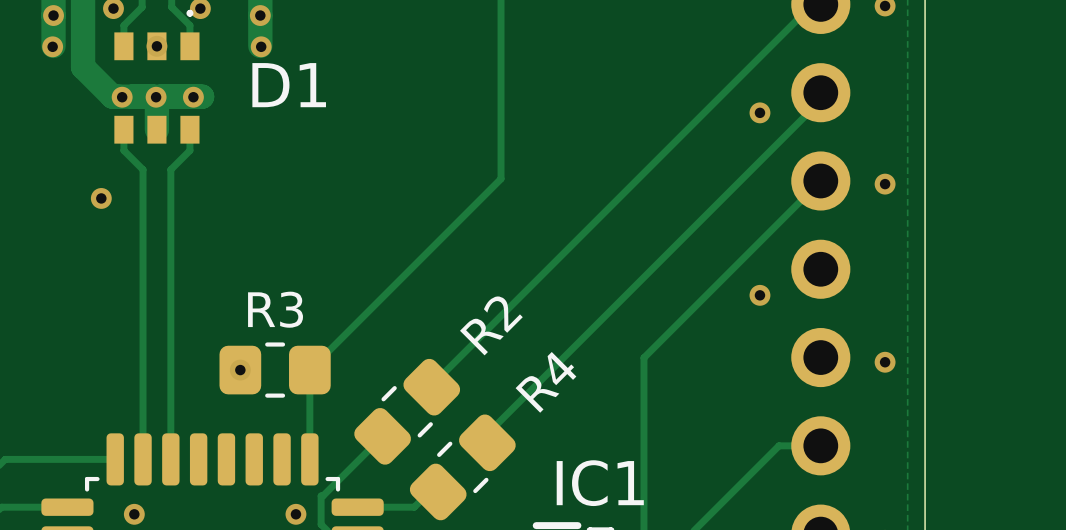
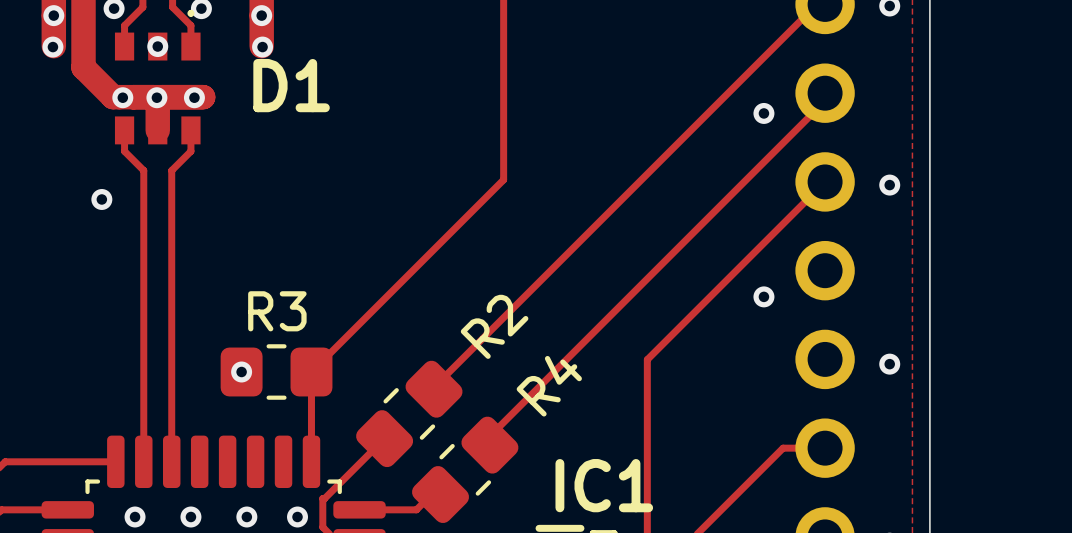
via: none -> (190, 516)
via: none -> (246, 516)

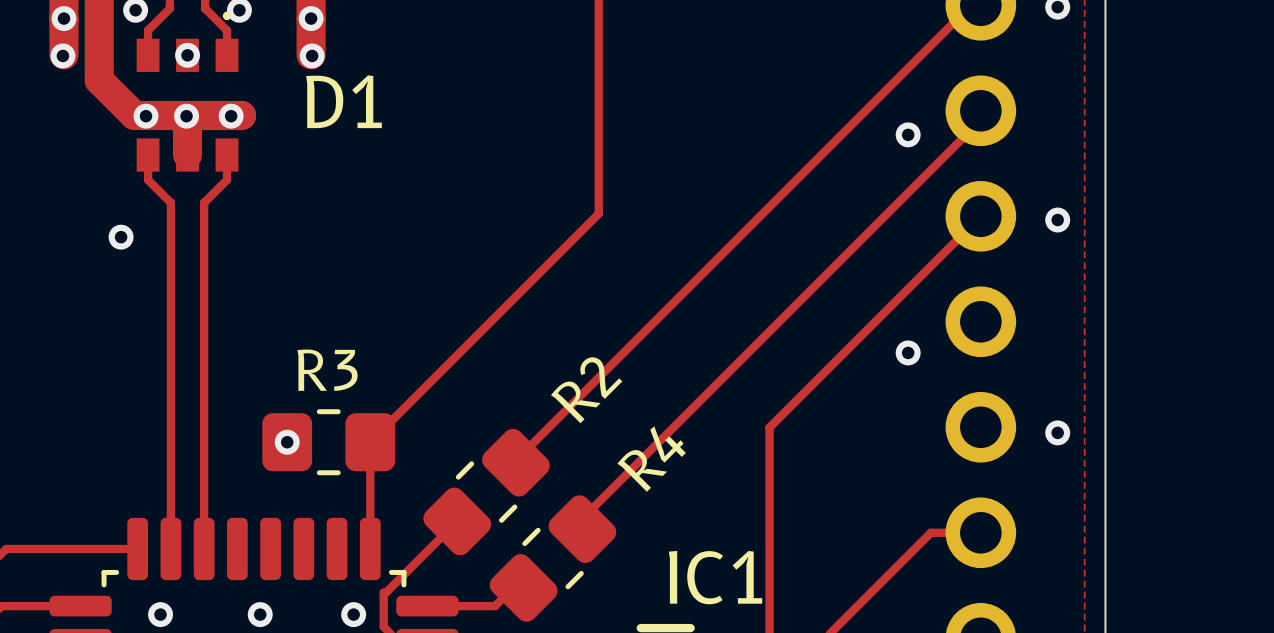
via: (190, 516) -> none
via: none -> (260, 614)
via: (246, 516) -> none

